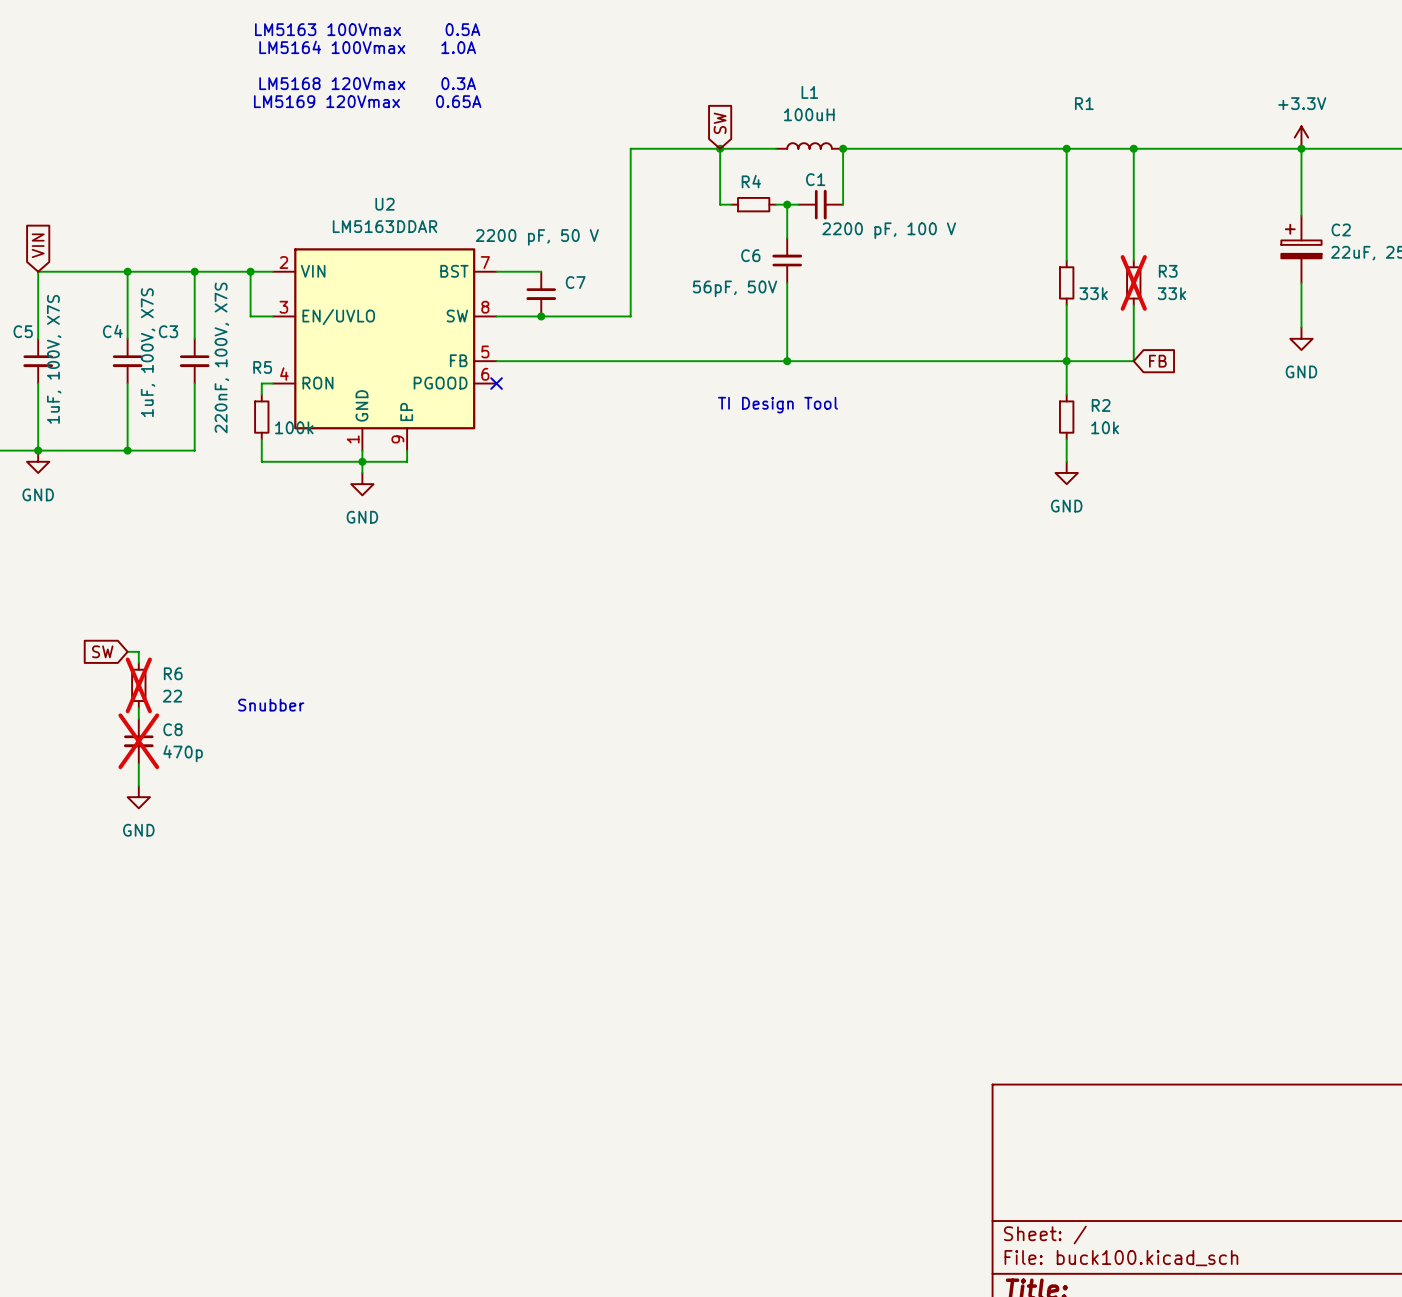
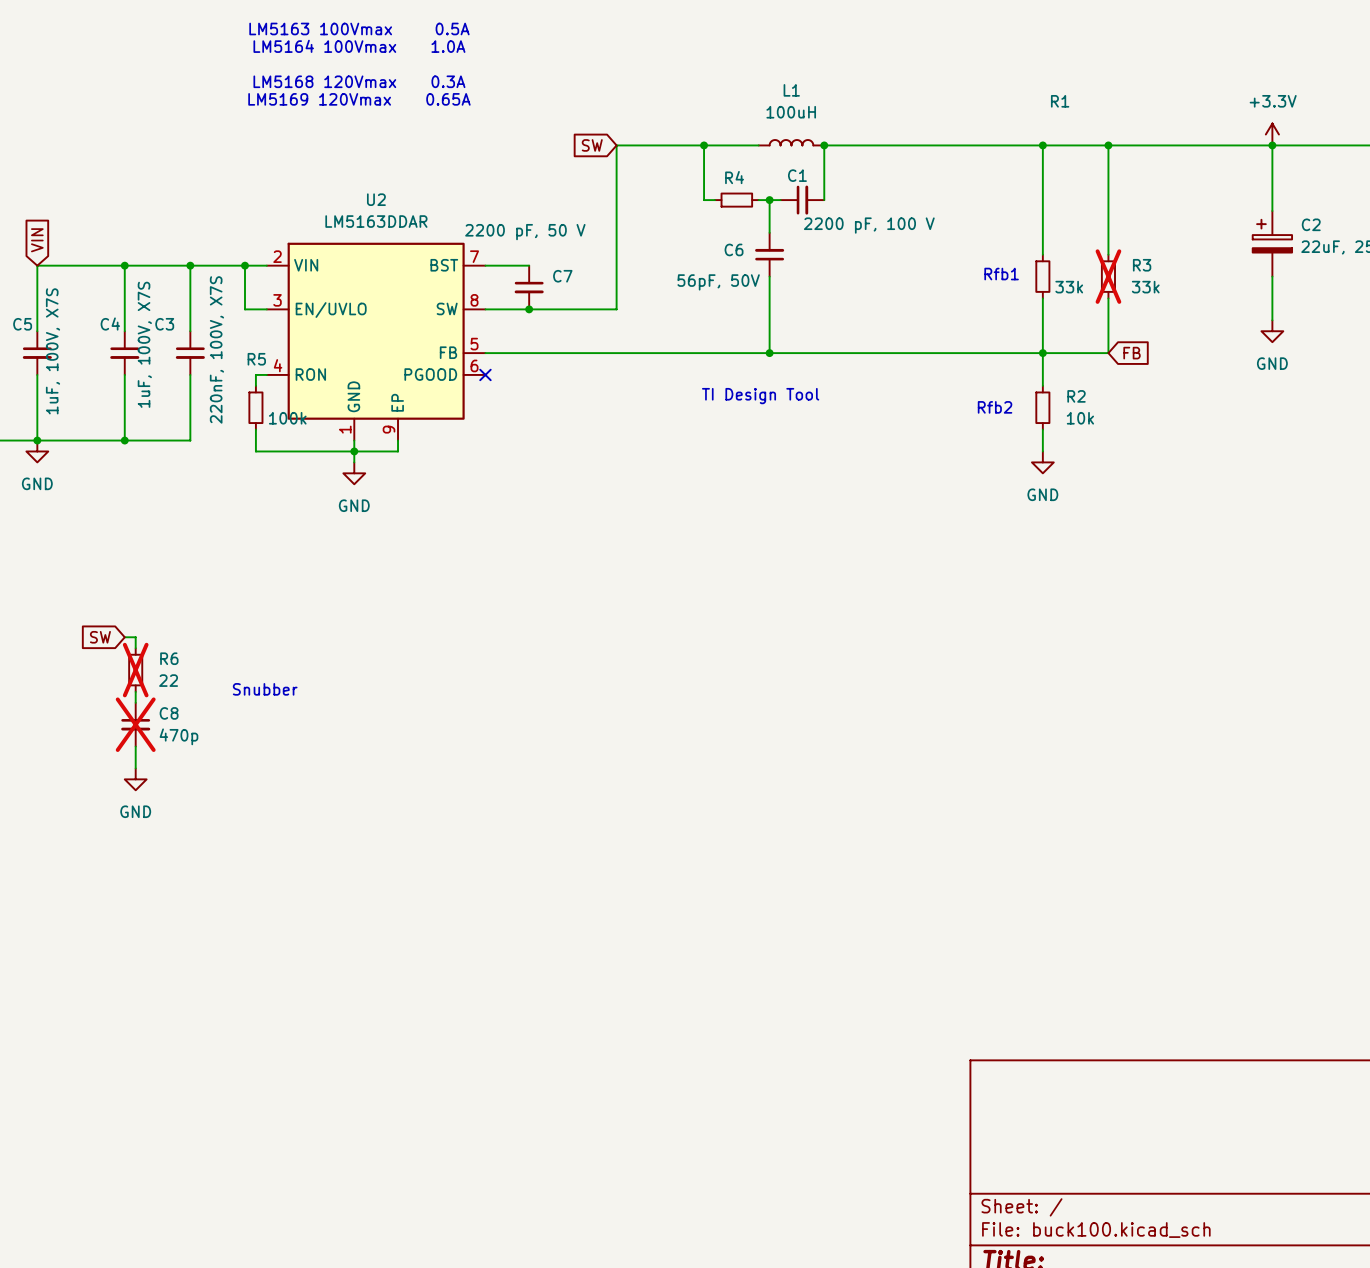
global label rotation: 0° (720, 123) -> 90° counterclockwise (592, 145)
global label position: SW (720, 123) -> SW (592, 145)
text: none -> Rfb1 (1001, 274)
text: none -> Rfb2 (995, 407)

